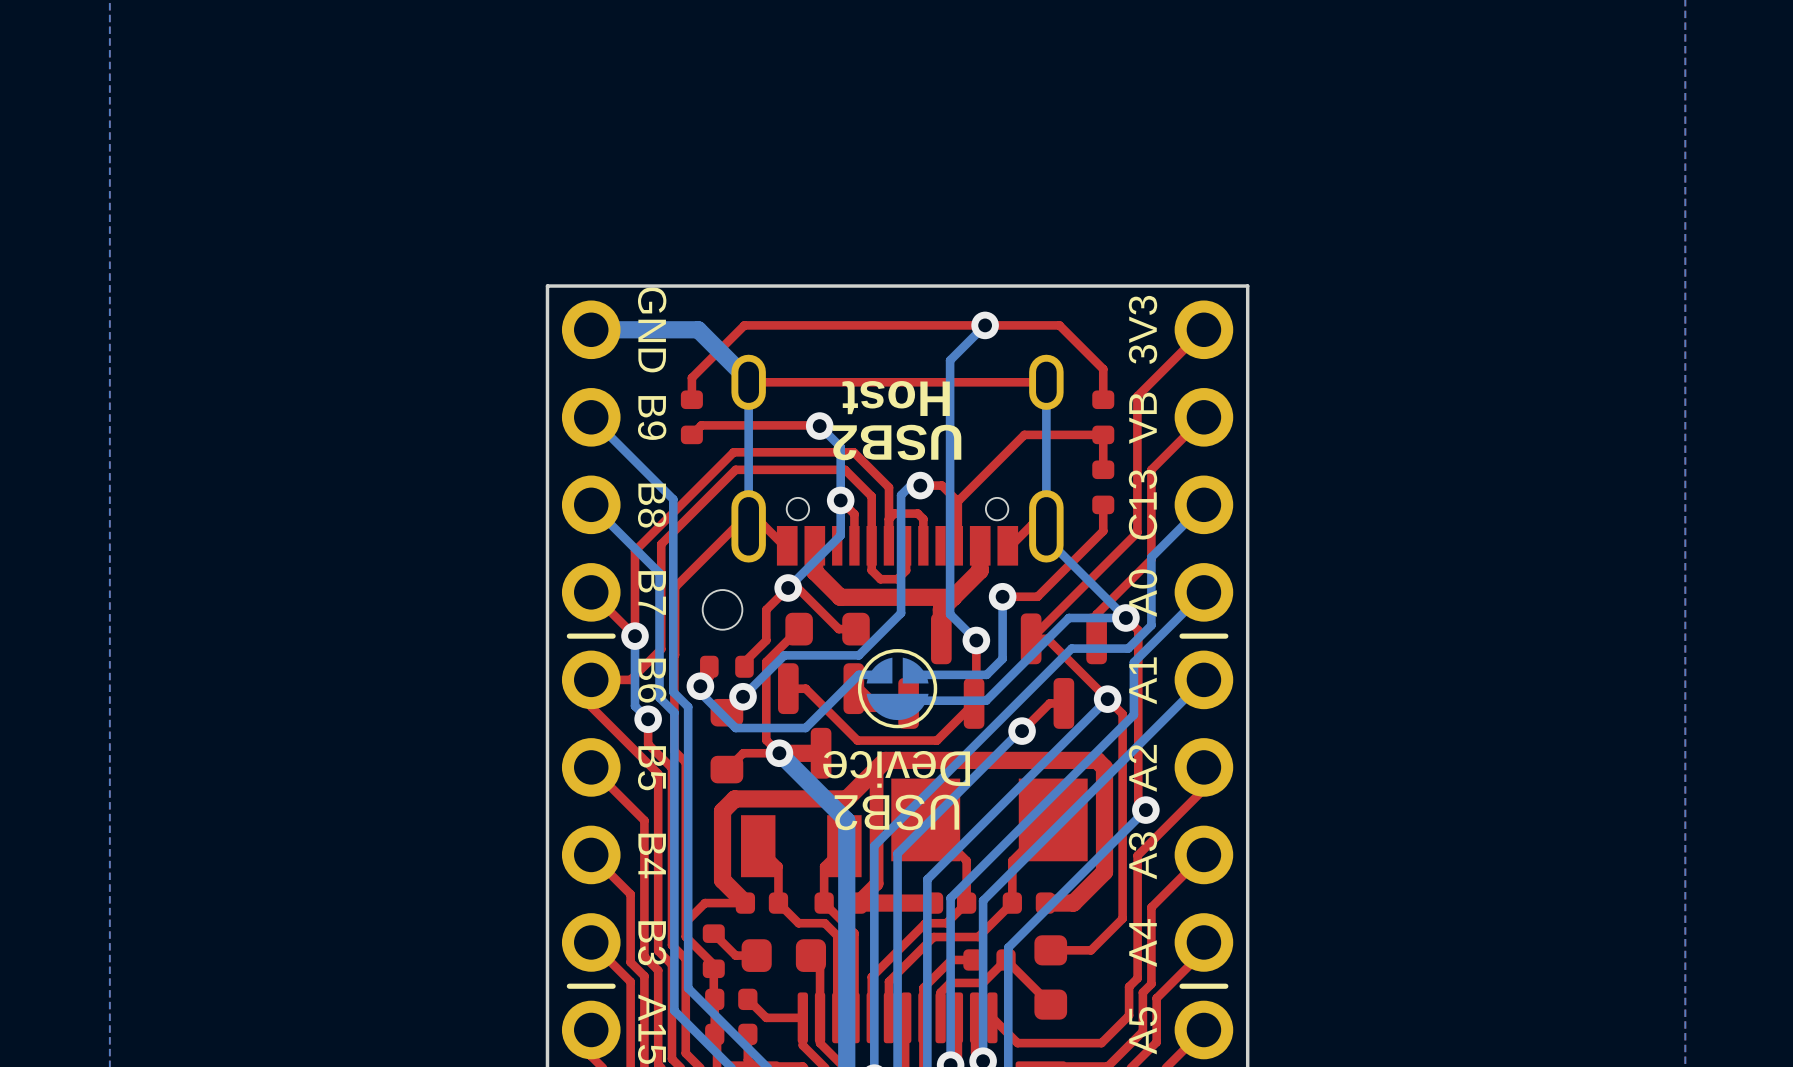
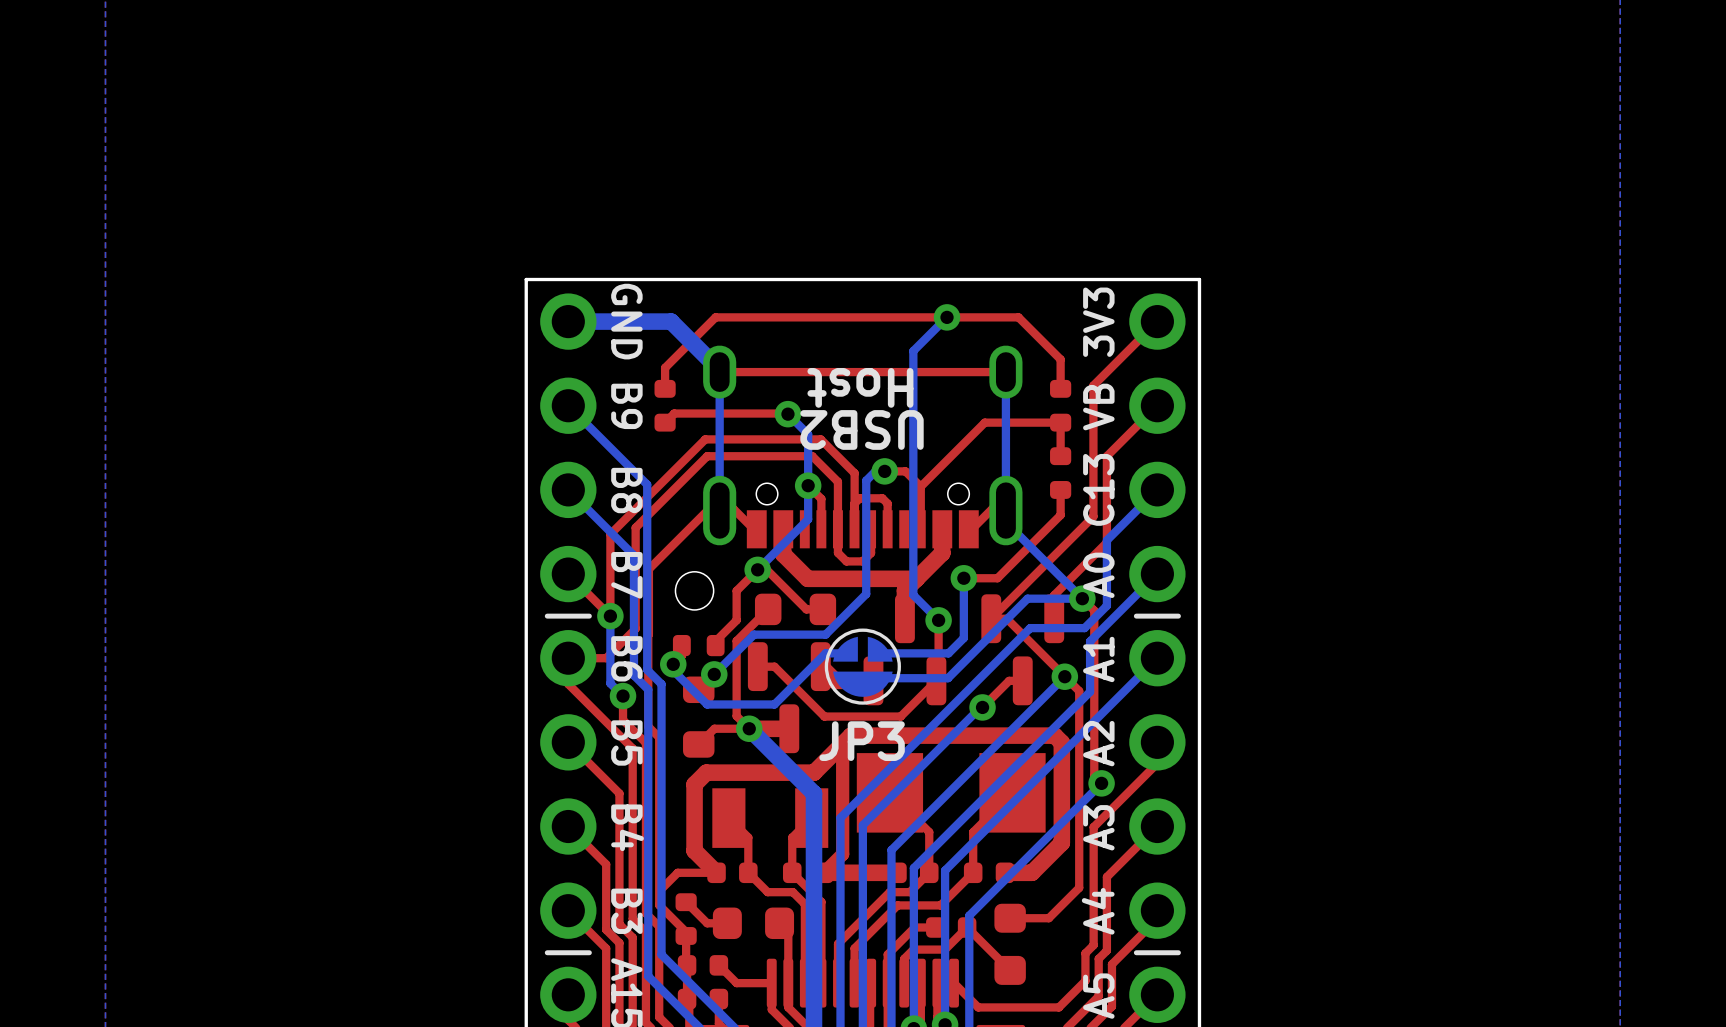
JP3 name: none -> JP3 (862, 741)
JP3 text: Device (896, 769) -> none
JP3 text: USB2 (896, 812) -> none

